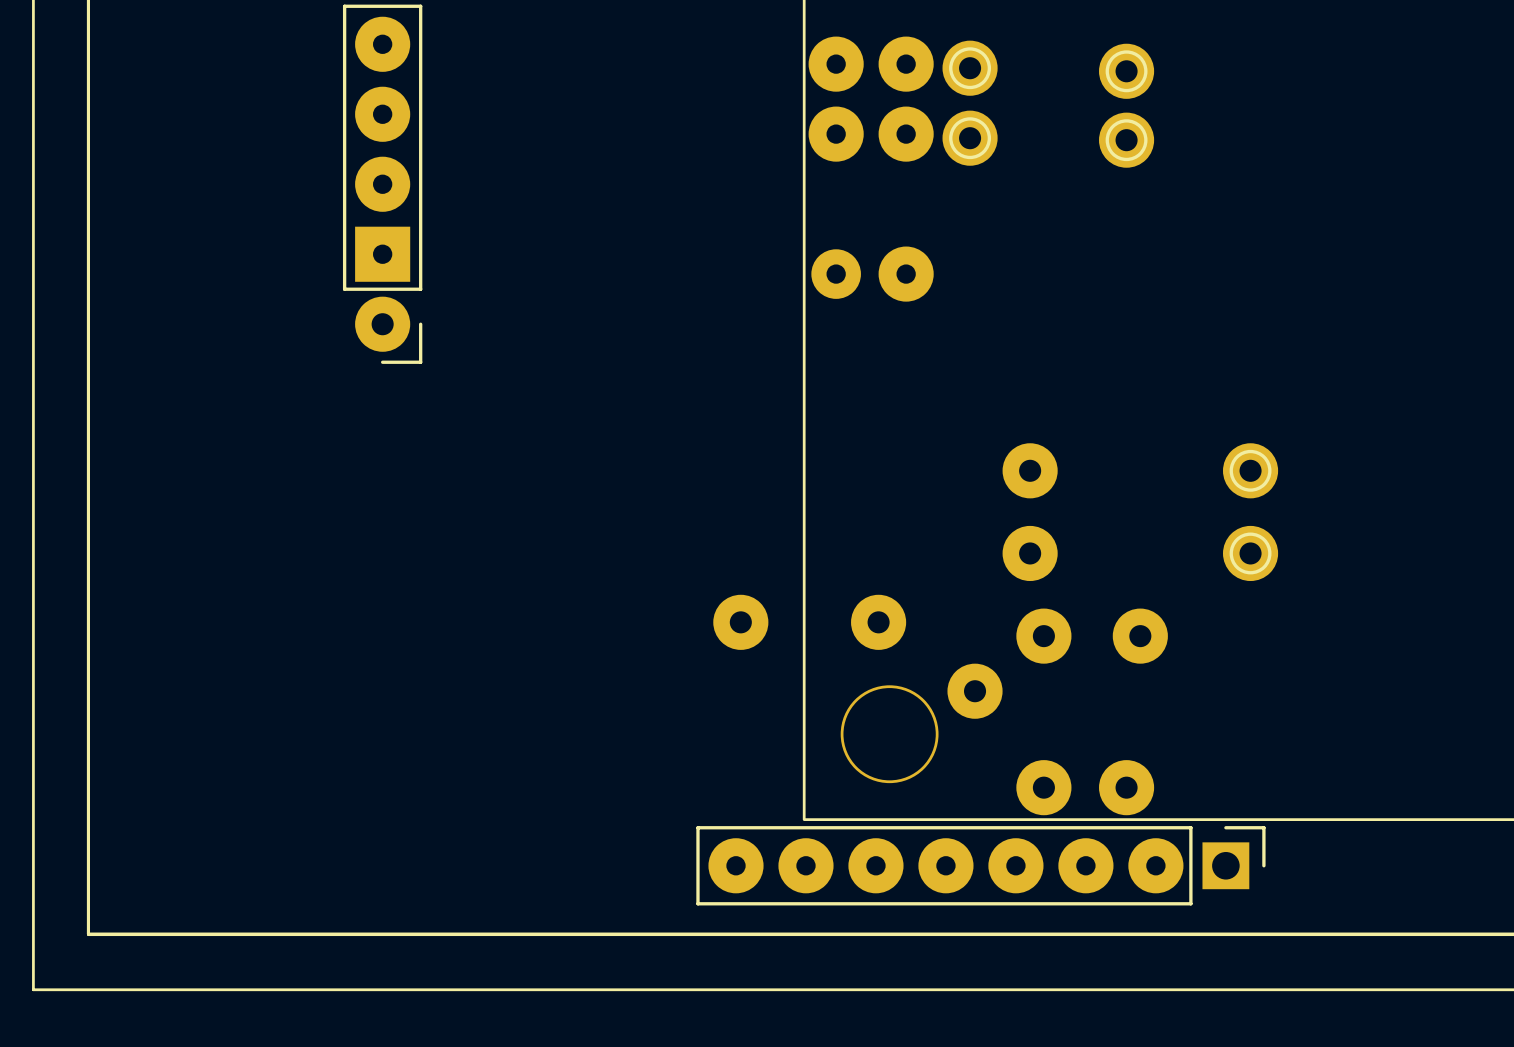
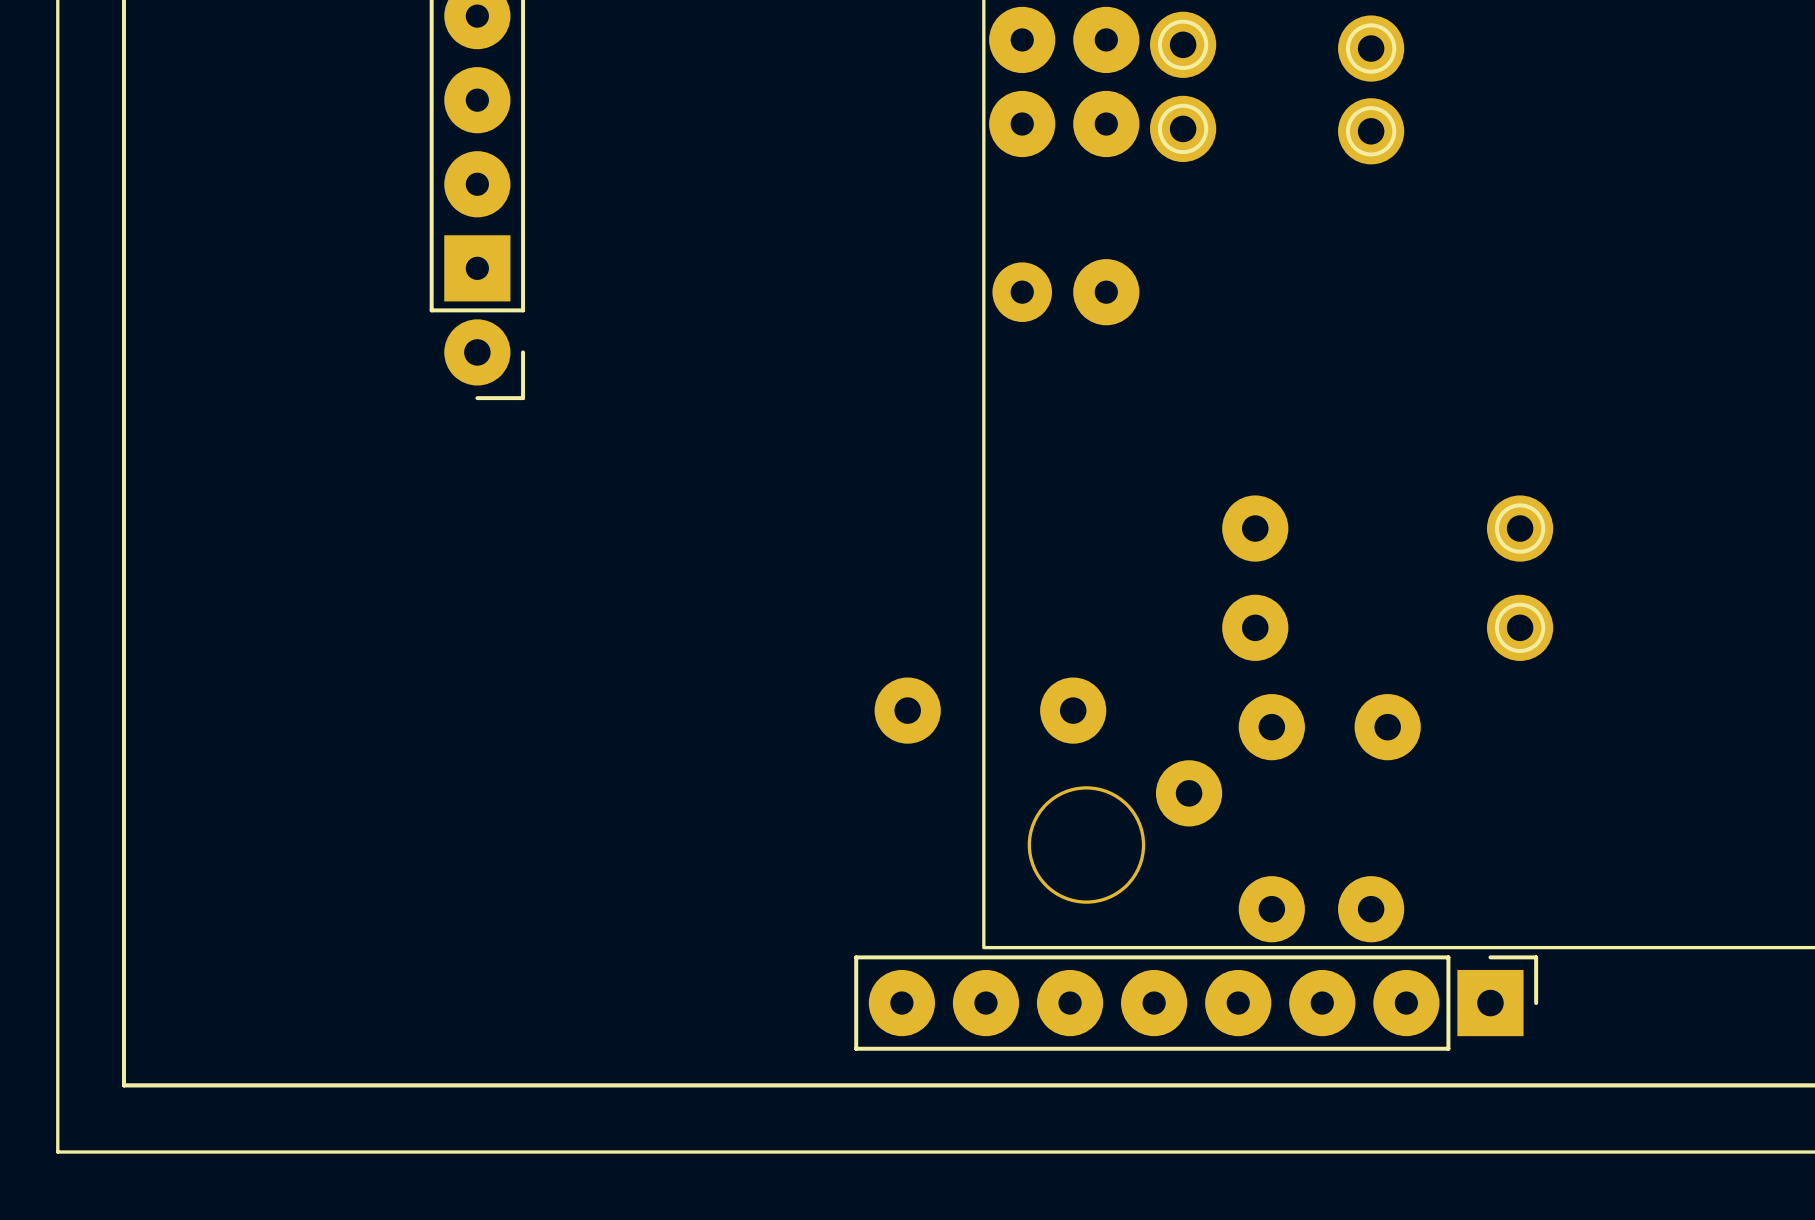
part footprint: [696, 826, 1266, 906] -> [854, 955, 1539, 1051]

